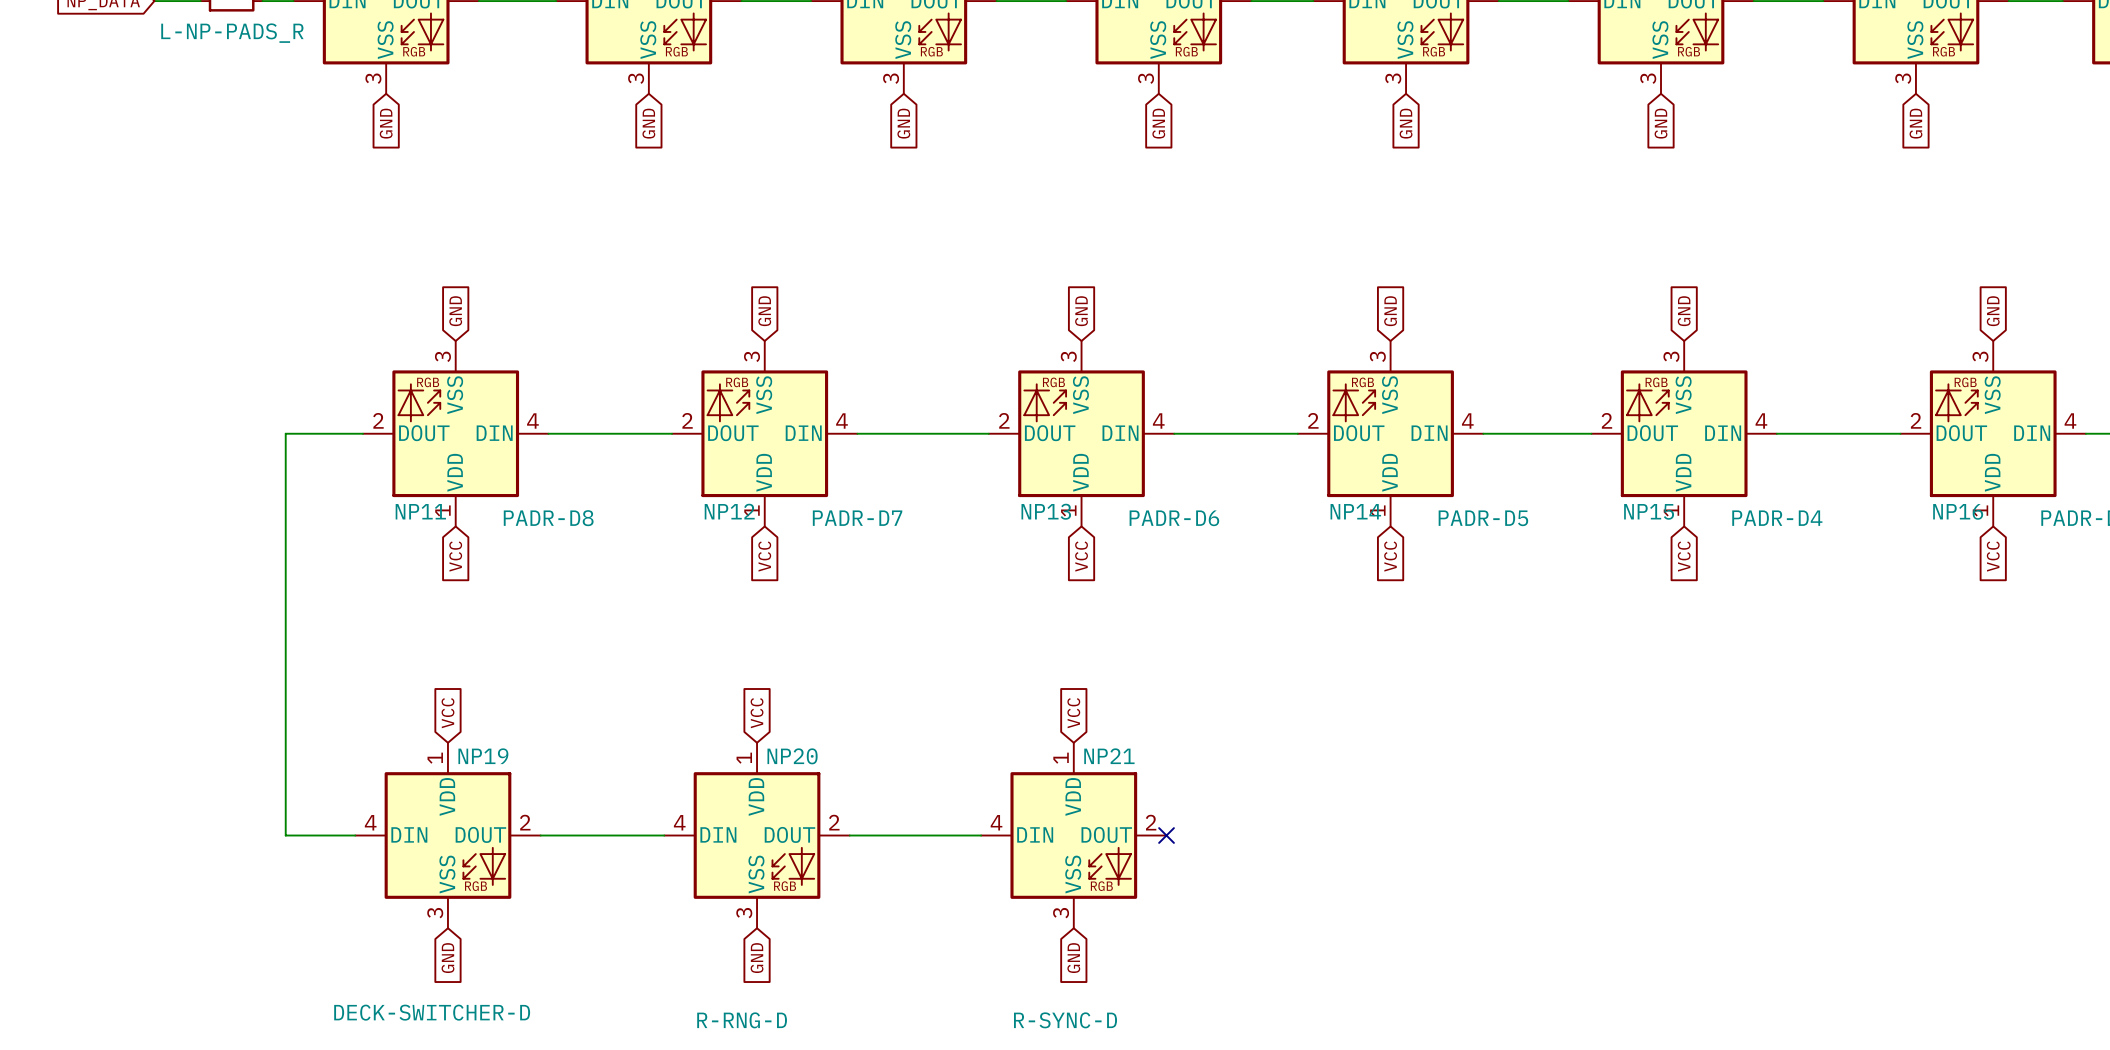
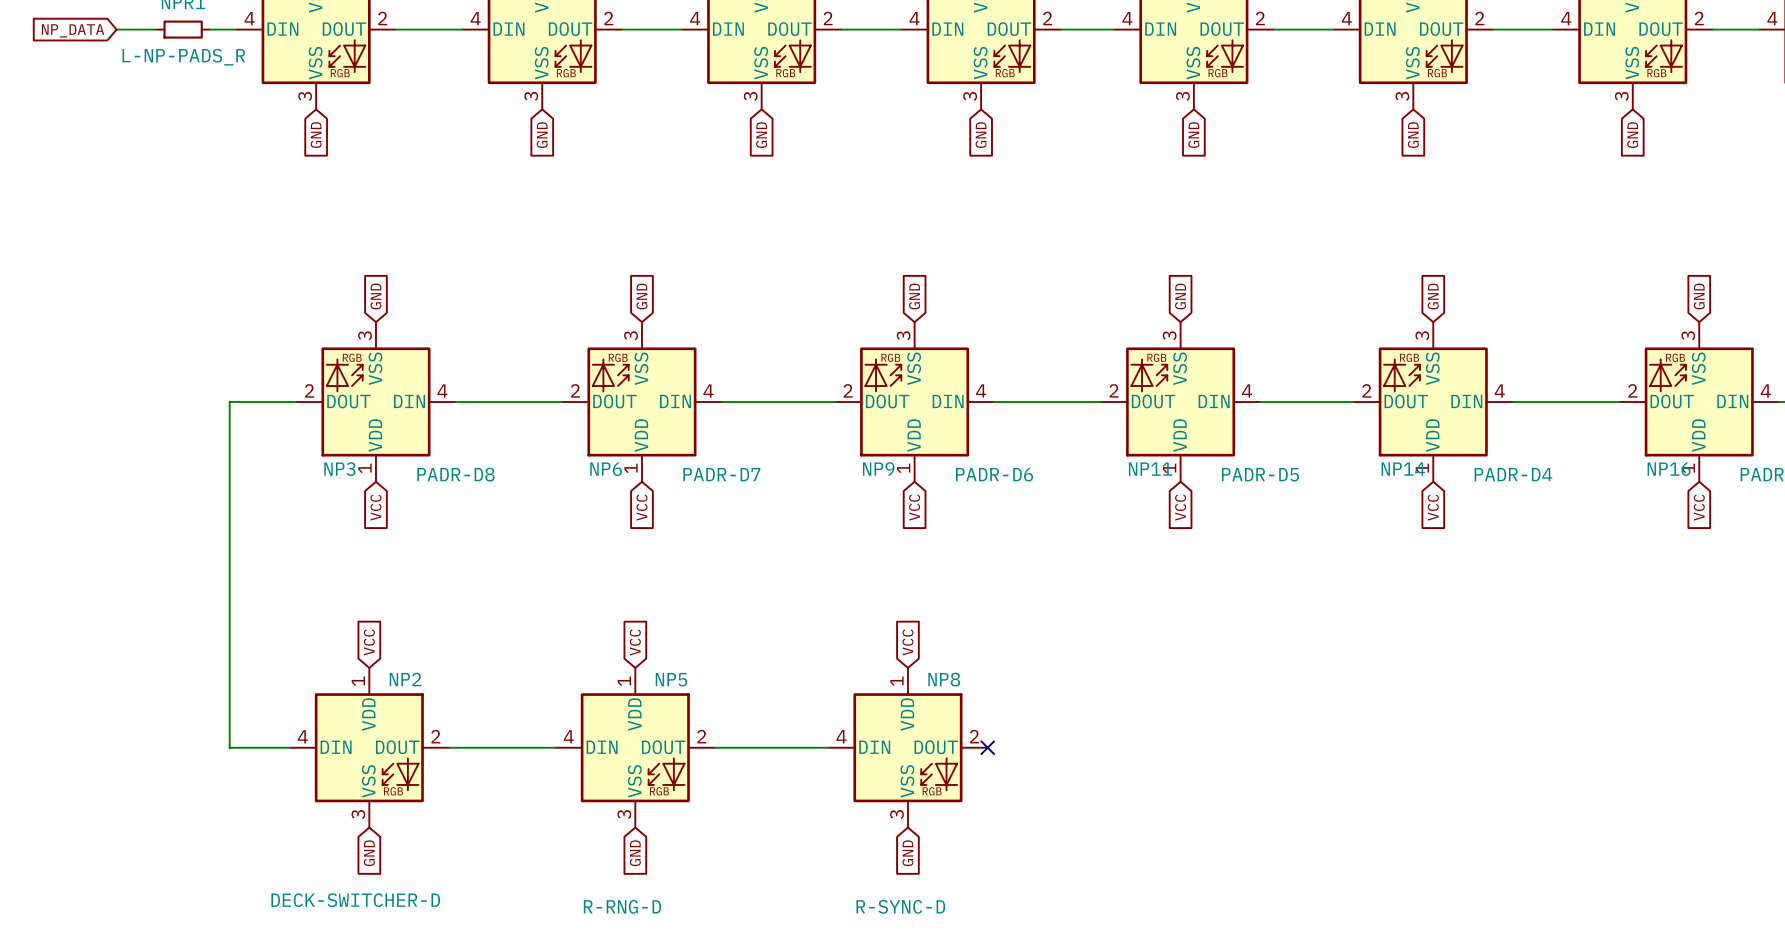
NP11 name: NP11 (420, 511) -> NP3 (339, 469)
NP12 name: NP12 (729, 511) -> NP6 (606, 469)
NP13 name: NP13 (1046, 511) -> NP9 (878, 468)
NP14 name: NP14 (1355, 511) -> NP11 (1150, 469)
NP15 name: NP15 (1649, 511) -> NP14 (1403, 469)
NP19 name: NP19 (483, 756) -> NP2 (405, 679)
NP20 name: NP20 (792, 756) -> NP5 (671, 679)
NP21 name: NP21 (1109, 756) -> NP8 (944, 679)

